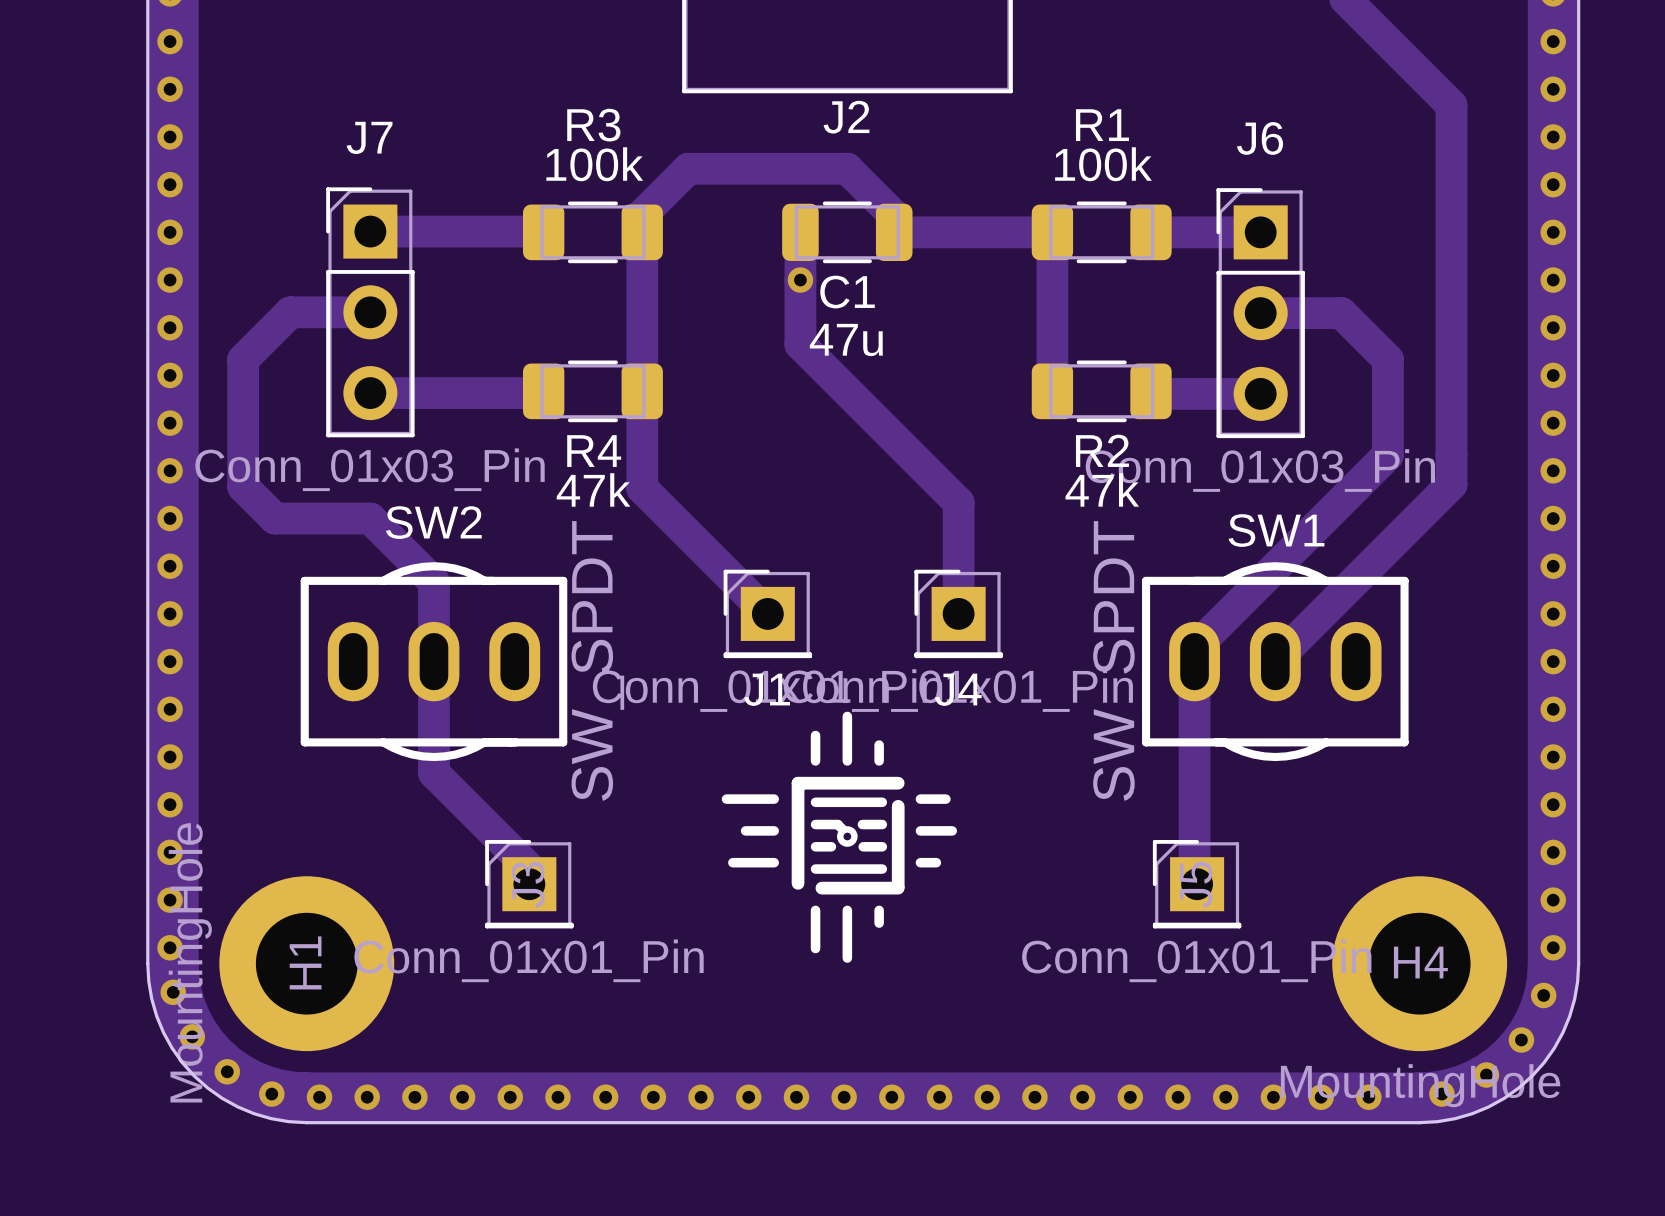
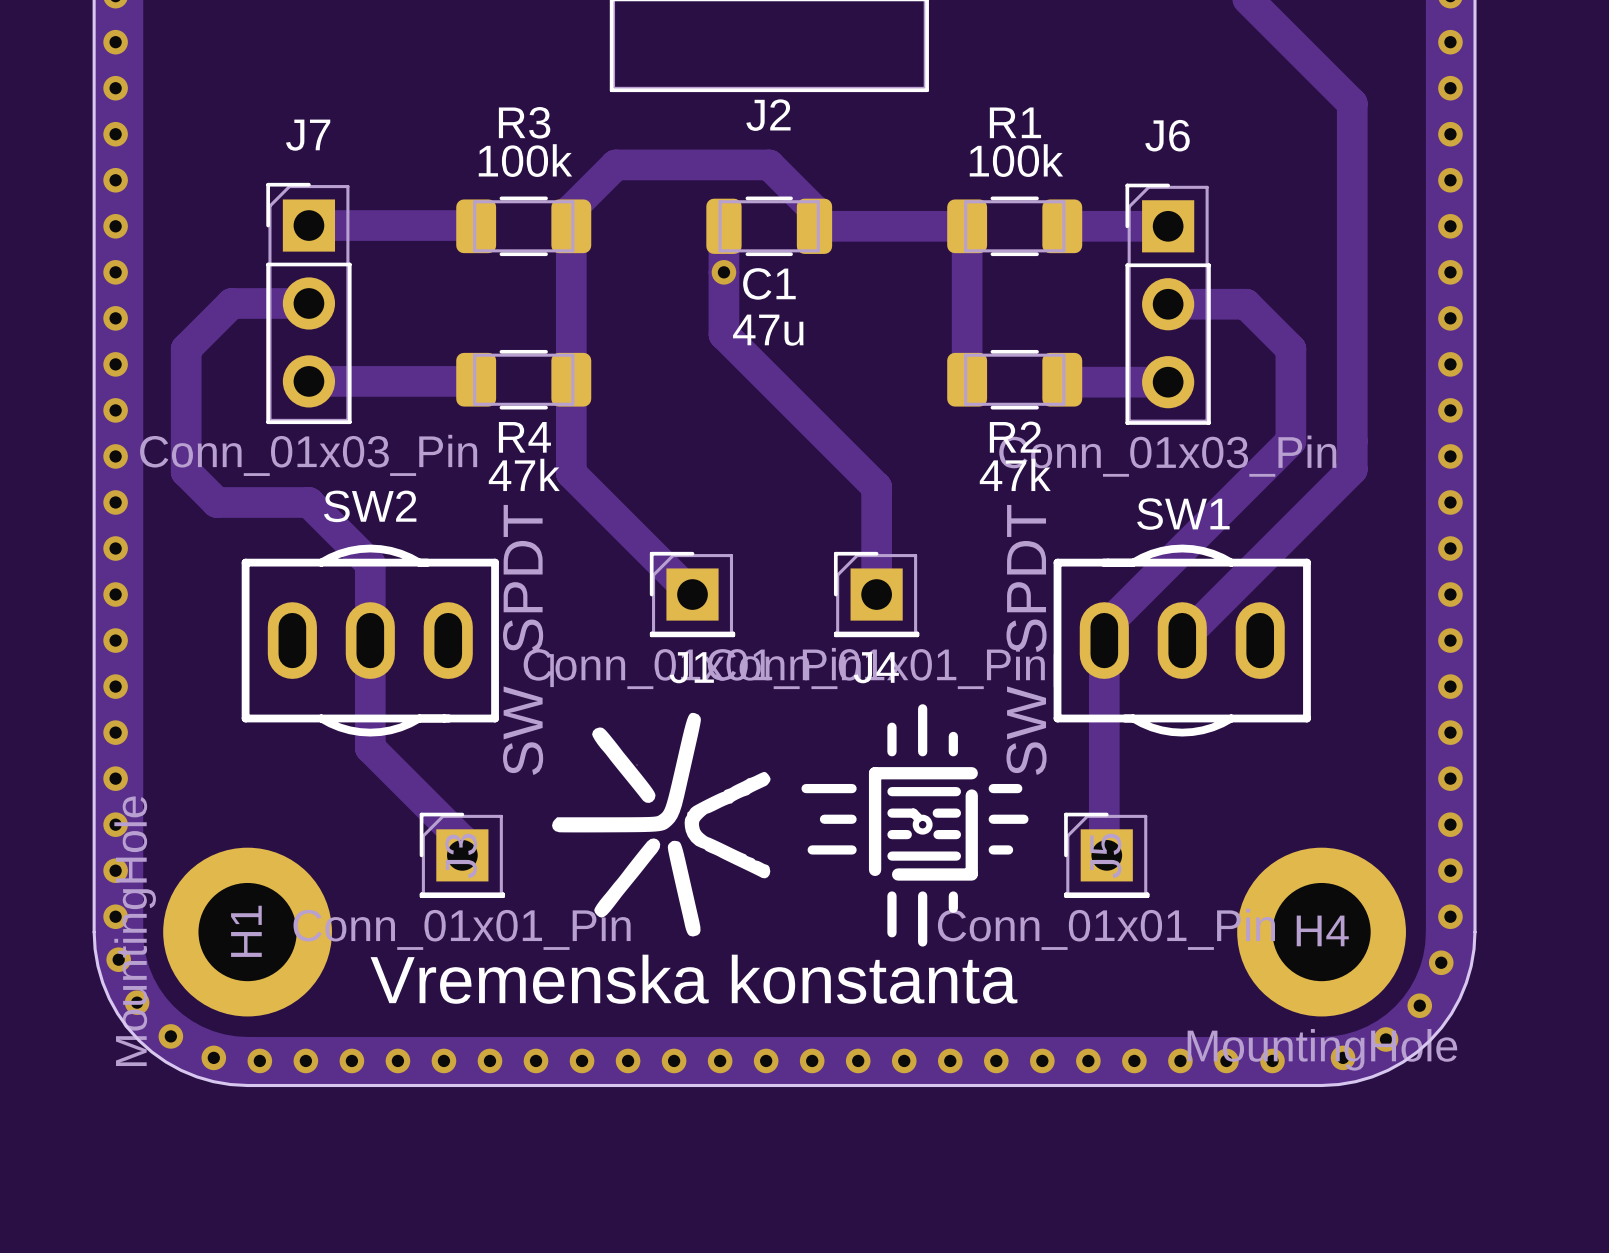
drawing: none -> [552, 712, 771, 937]
drawing position: (839, 837) -> (914, 825)
text: none -> Vremenska konstanta (694, 979)

